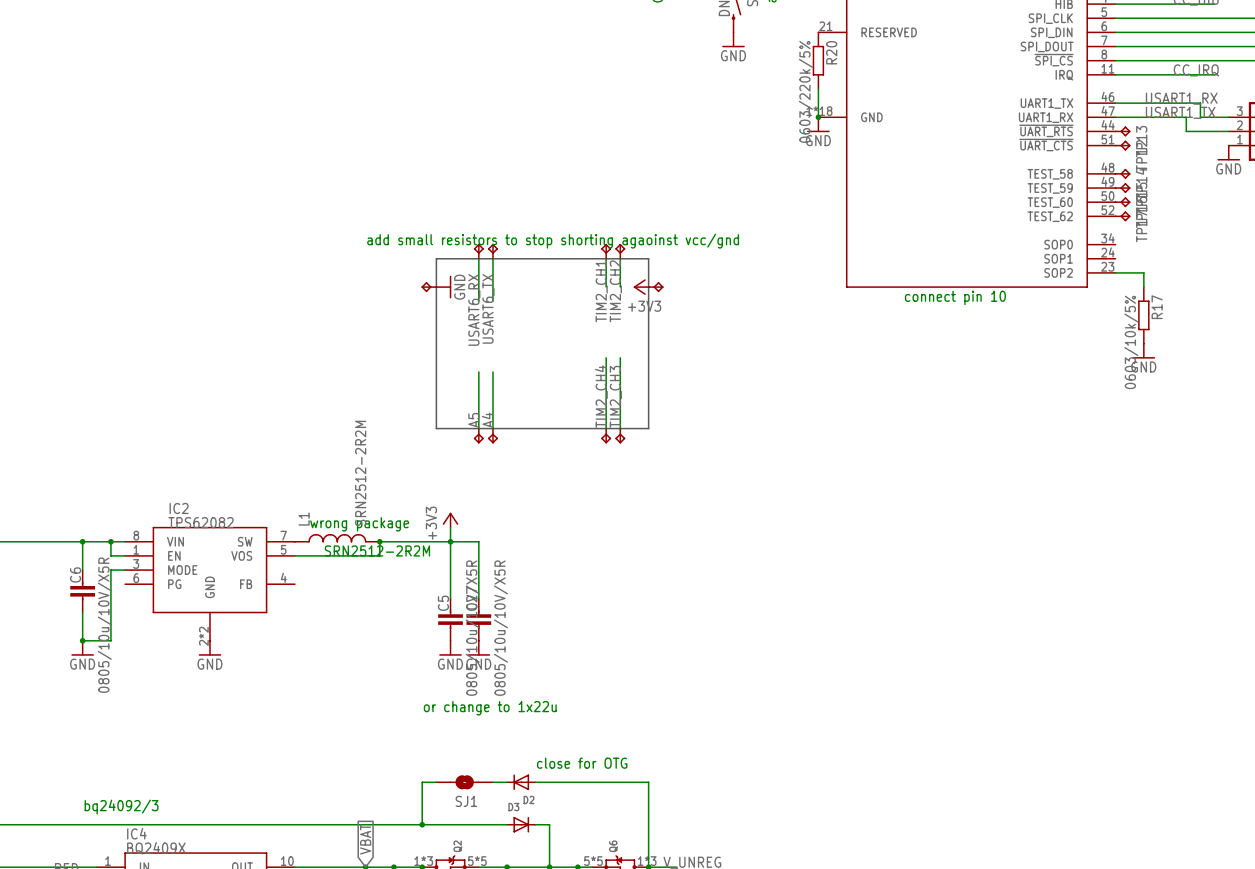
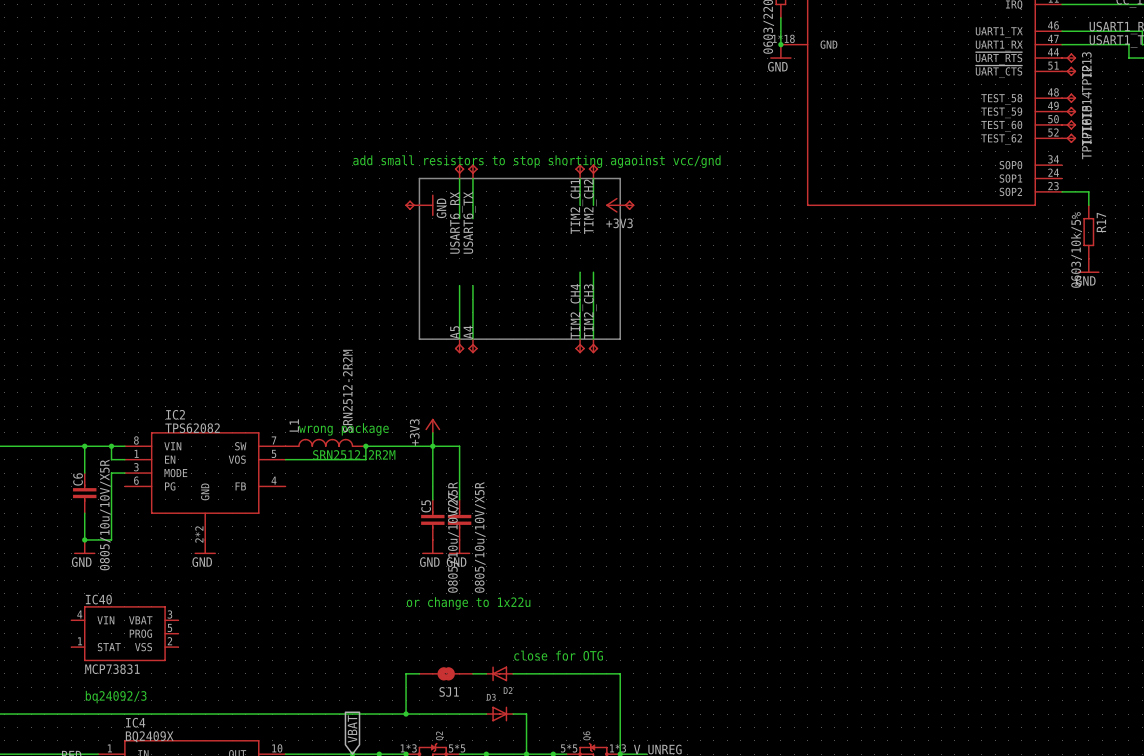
text: connect pin 10 (955, 297) -> none
IC40: none -> MCP73831 (124, 633)

